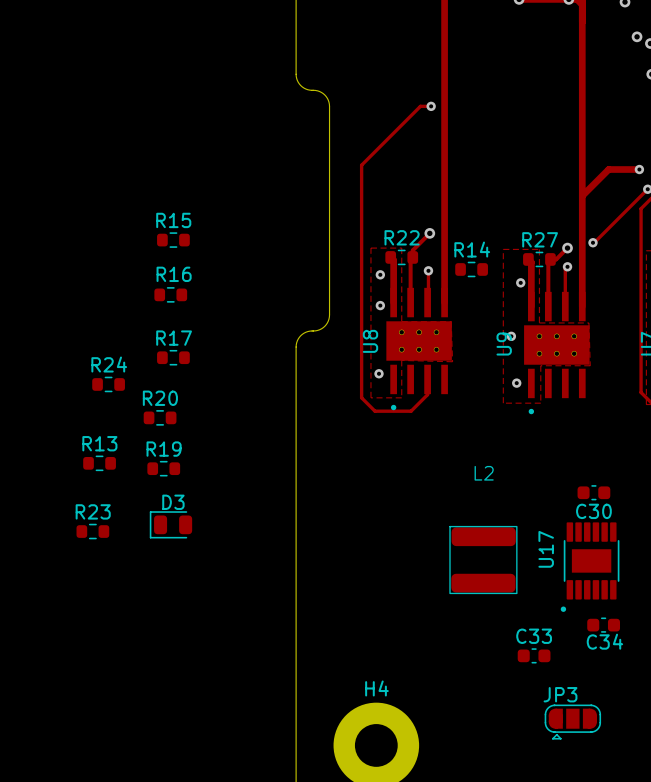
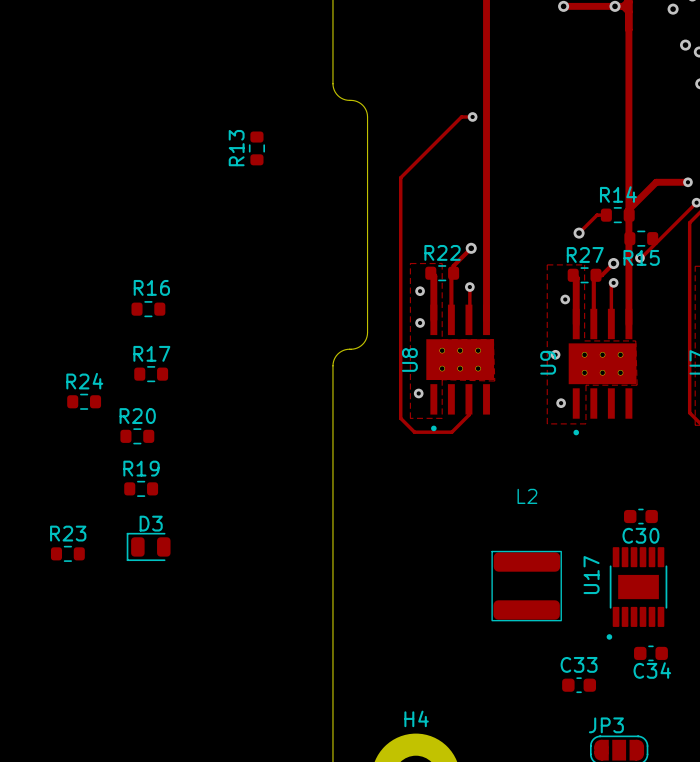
track: none -> (606, 215) (597, 215) (579, 233)
via: none -> (579, 233)
R15 name position: R15 (173, 220) -> R15 (641, 257)
R15 position: (173, 240) -> (641, 238)
R14 position: (471, 269) -> (617, 215)
R16 position: (170, 294) -> (148, 309)
R17 position: (173, 357) -> (151, 374)
R24 position: (108, 384) -> (84, 401)
R20 position: (160, 417) -> (137, 436)
R13 name position: R13 (99, 443) -> R13 (236, 148)
R13 rotation: 0° (99, 463) -> 90° clockwise (256, 148)
R13 position: (99, 463) -> (256, 148)
R19 position: (163, 468) -> (141, 488)
D3 position: (170, 524) -> (148, 546)
R23 position: (92, 531) -> (67, 553)

